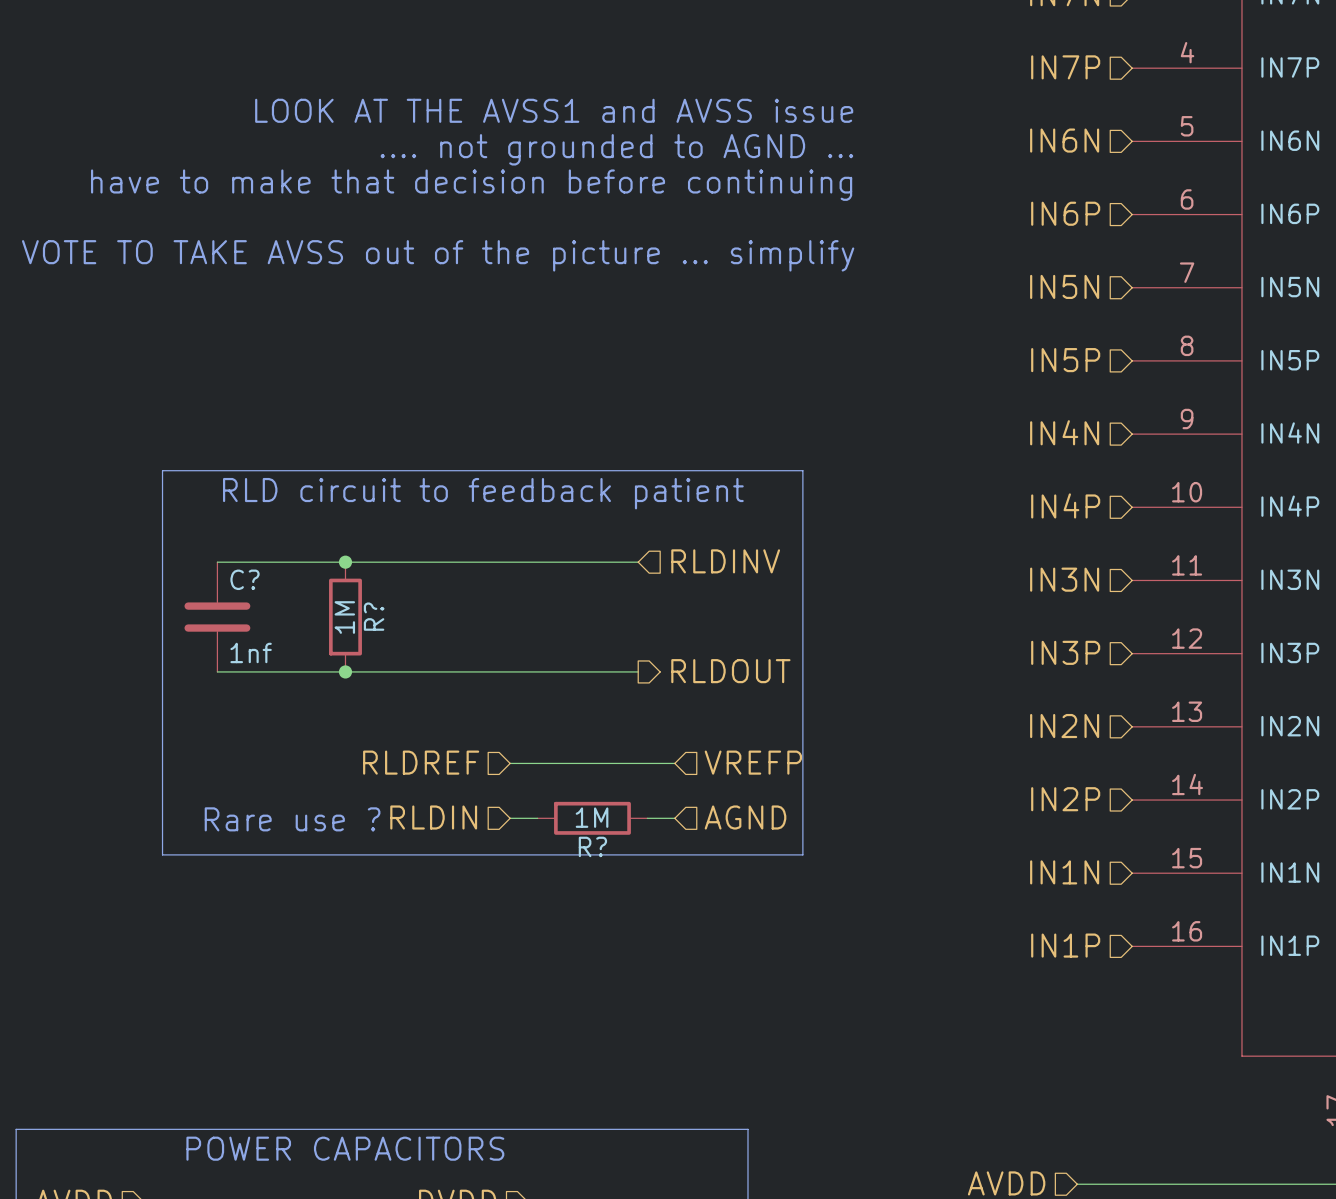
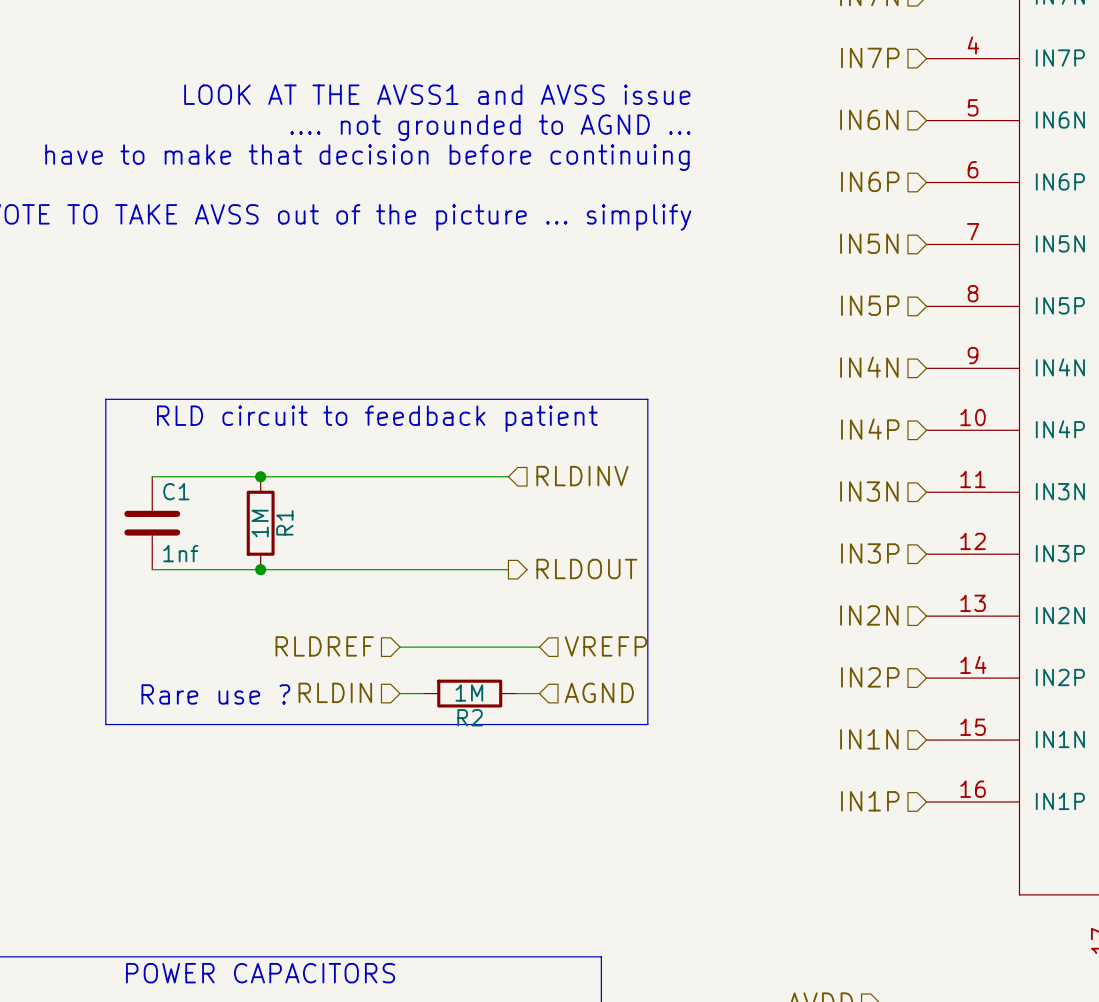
C? name: C? (244, 579) -> C1 (176, 491)
R? name: R? (374, 616) -> R1 (284, 522)
R? name: R? (592, 846) -> R2 (470, 717)

